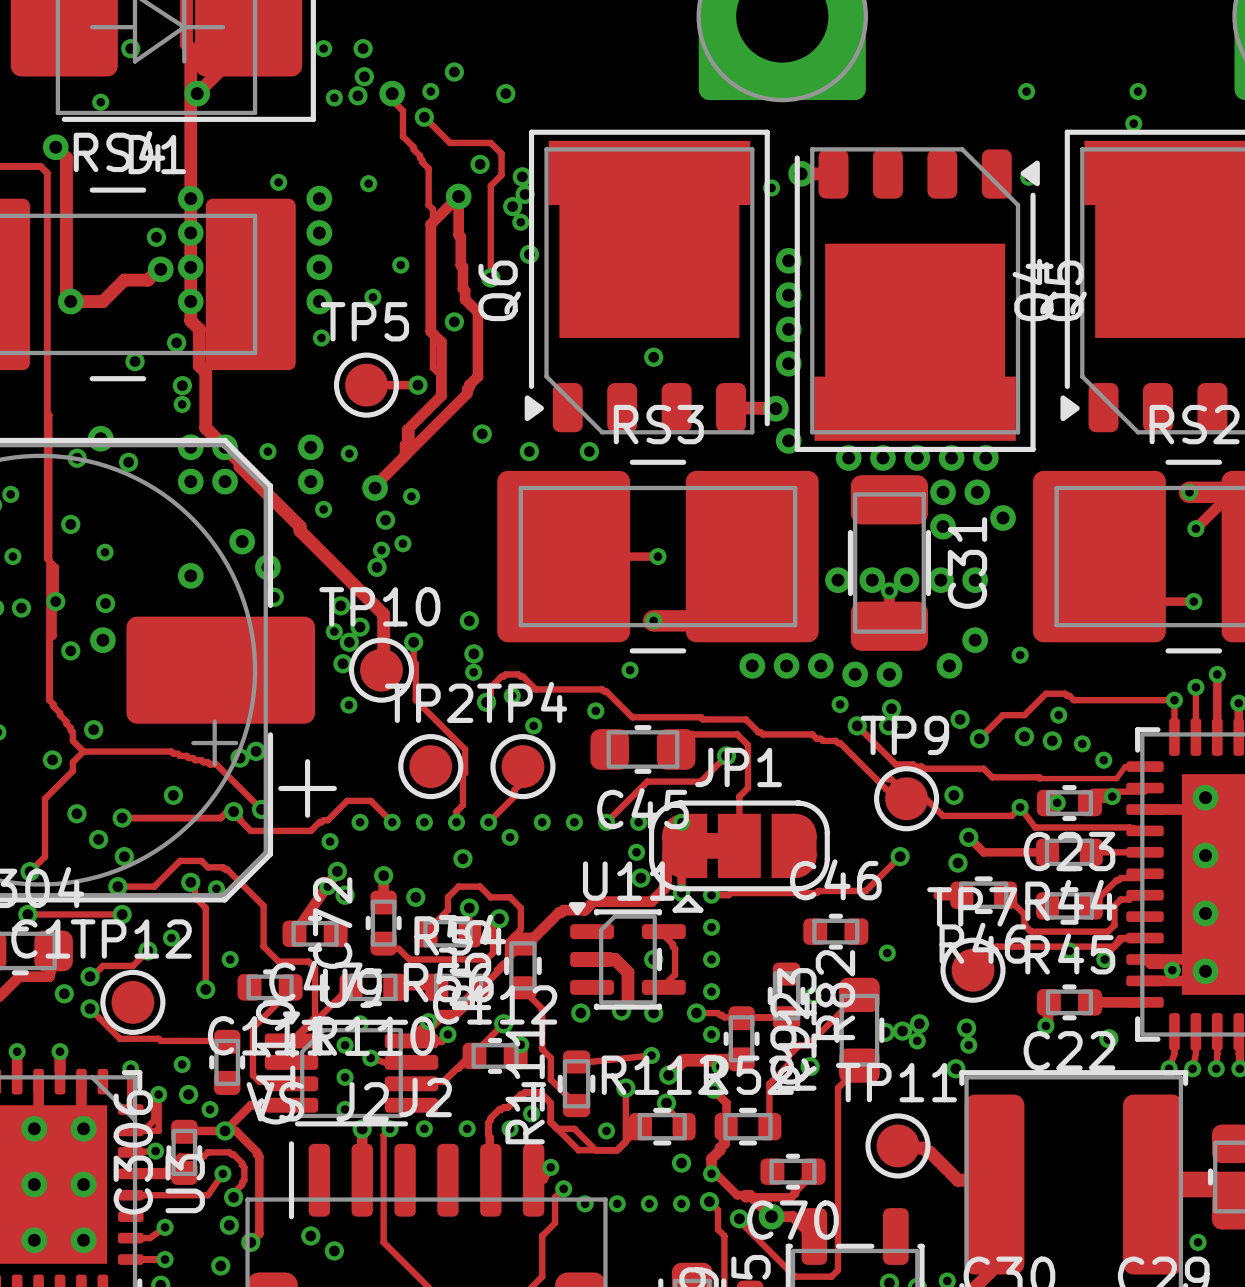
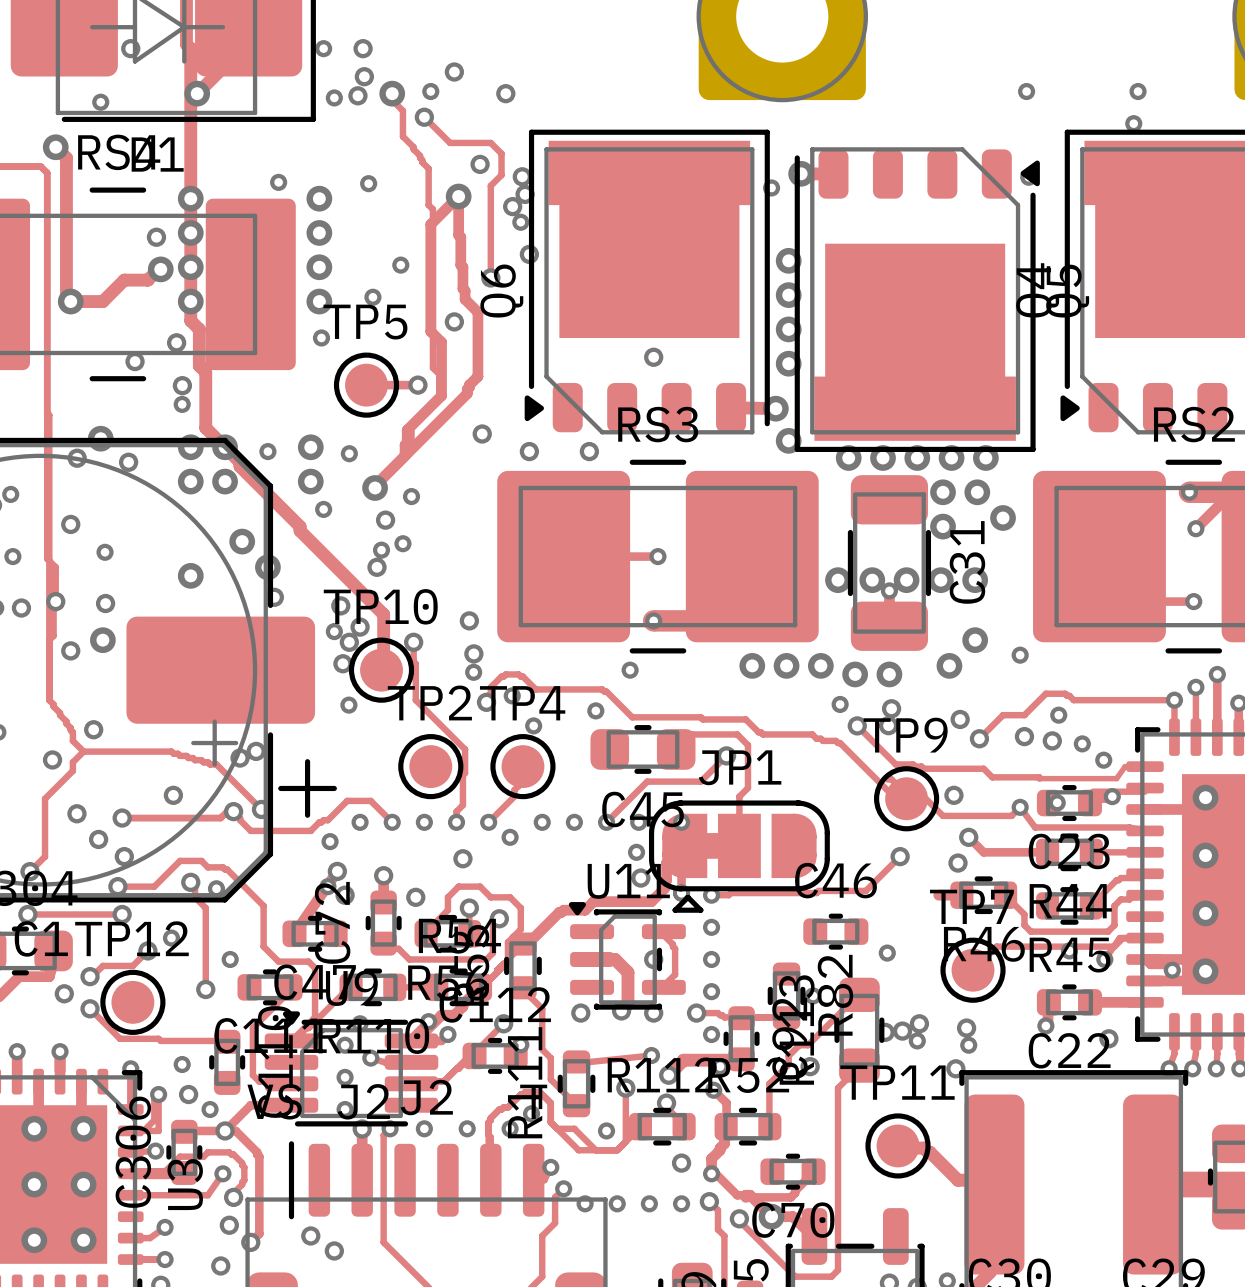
via: (1198, 1242) -> none

